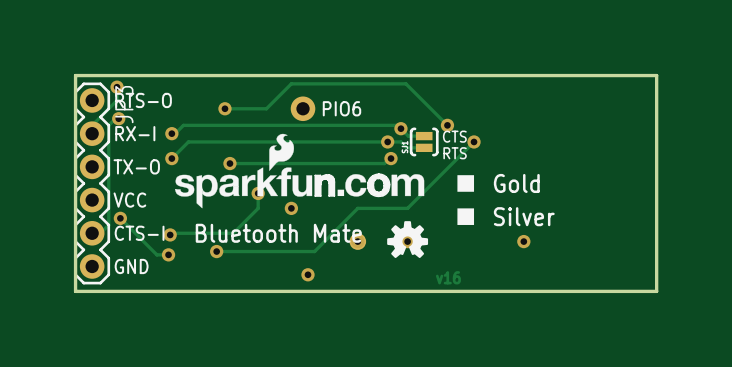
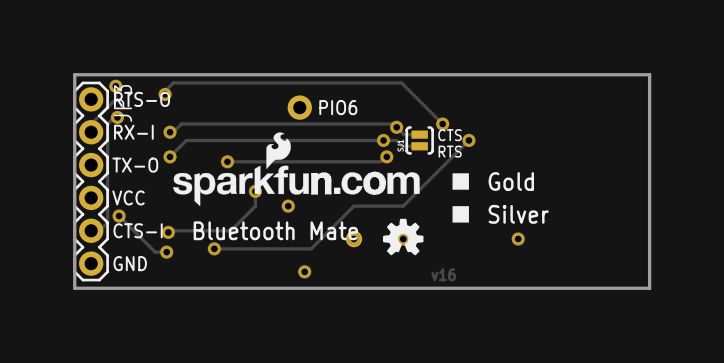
track: (291, 83) (266, 108) (224, 108) -> (288, 82) (173, 82) (165, 91) (165, 94)
via position: (224, 108) -> (165, 94)

